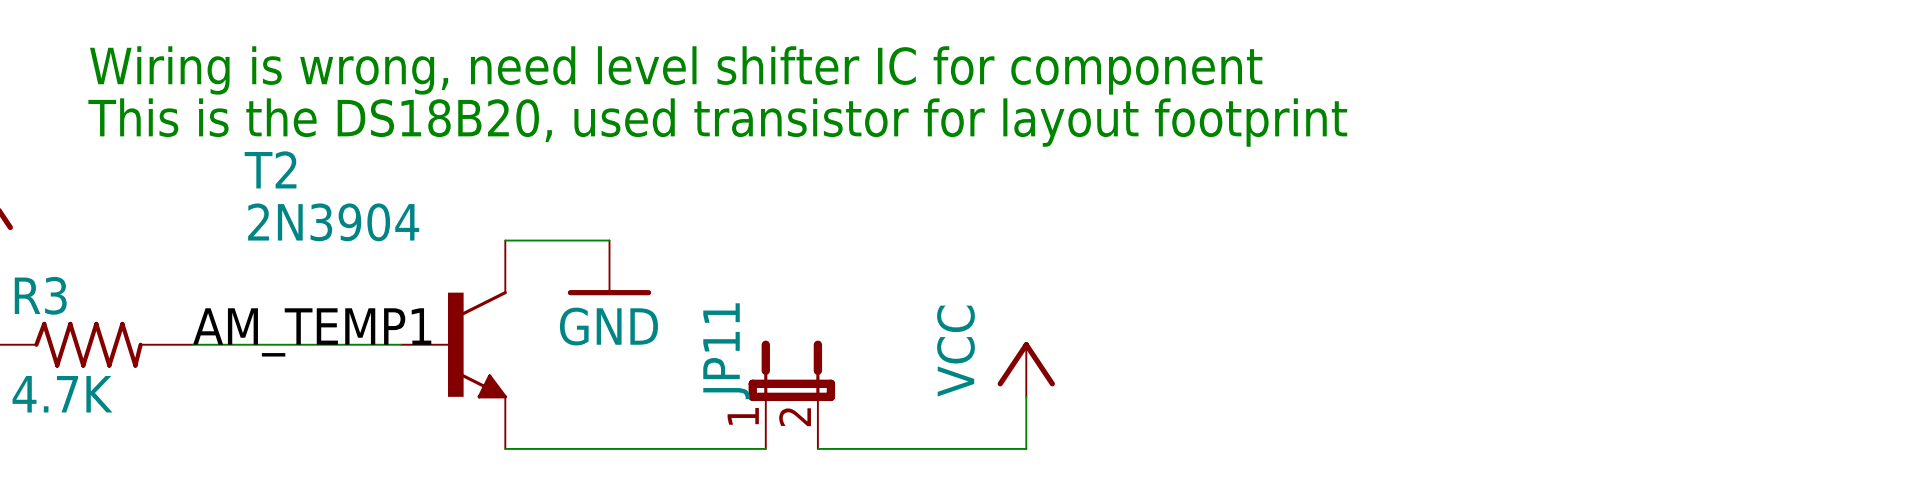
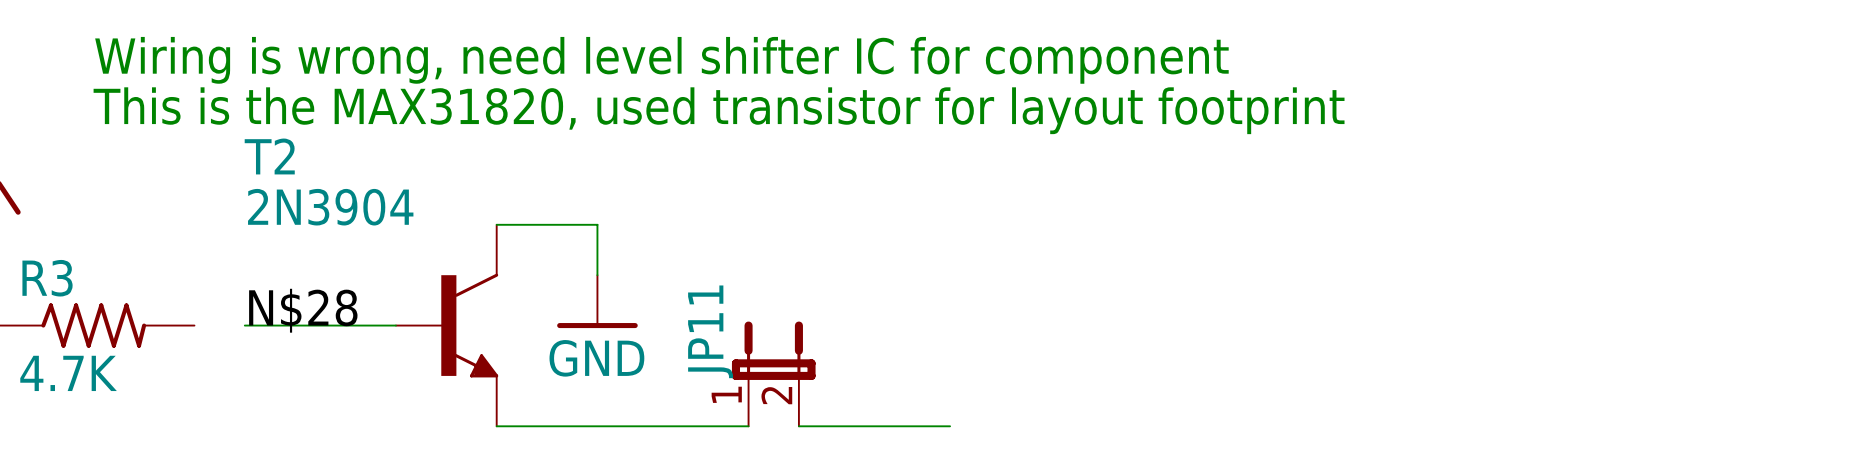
text: This is the DS18B20, used transistor for layout footprint (717, 122) -> This is the MAX31820, used transistor for layout footprint (719, 110)
power symbol position: GND (609, 267) -> GND (597, 301)
label: none -> N$28 (303, 310)
label: AM_TEMP1 (312, 332) -> none
wire: (192, 344) (244, 344) -> none
power symbol: VCC (1026, 369) -> none
wire: (1026, 396) (1026, 448) (974, 448) -> none

